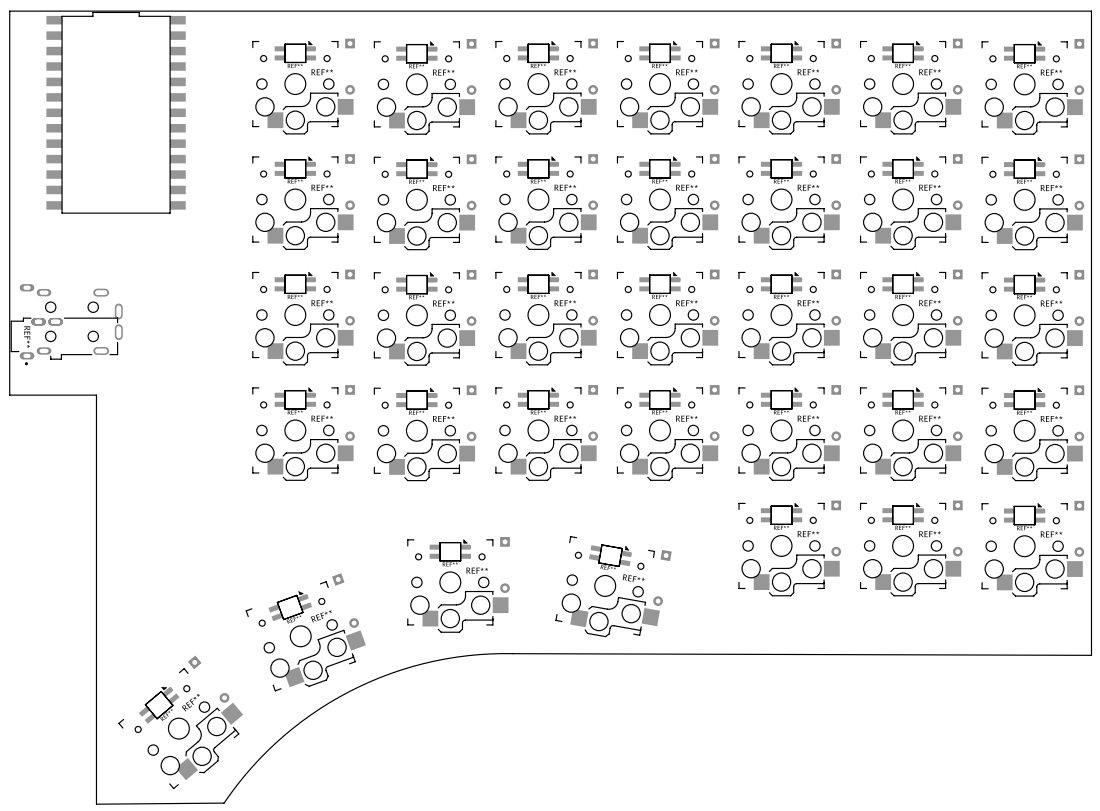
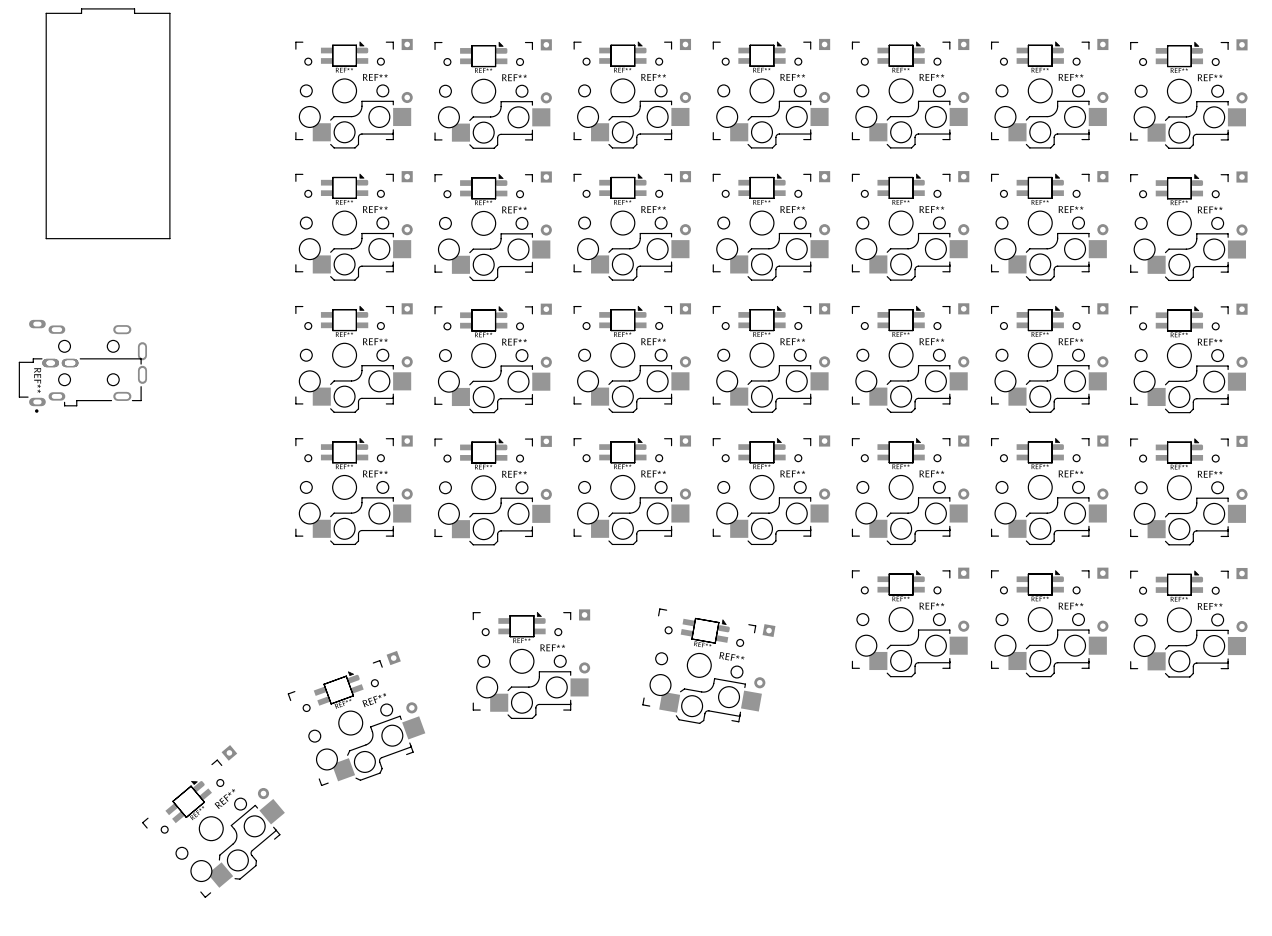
board edge: (1091, 11) (1091, 655) (501, 653) (456, 657) (423, 663) (380, 677) (349, 691) (320, 708) (292, 728) (267, 751) (244, 775) (224, 803) (96, 804) (96, 395) (9, 395) (9, 11) (1091, 11) -> none
drawing: none -> [45, 8, 171, 240]
part: (116, 112) -> none

